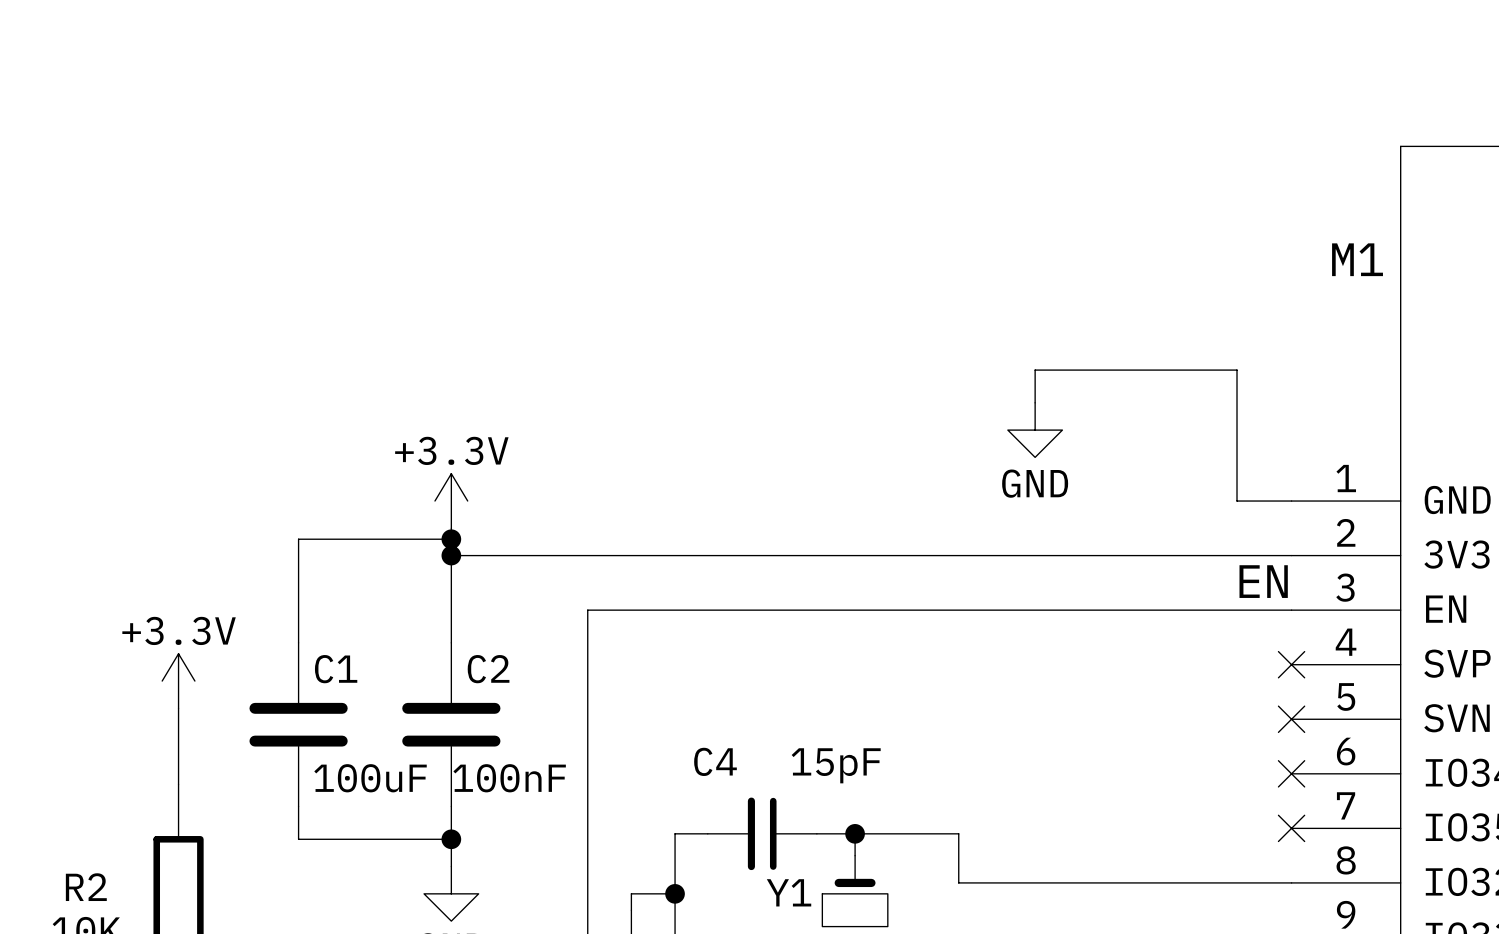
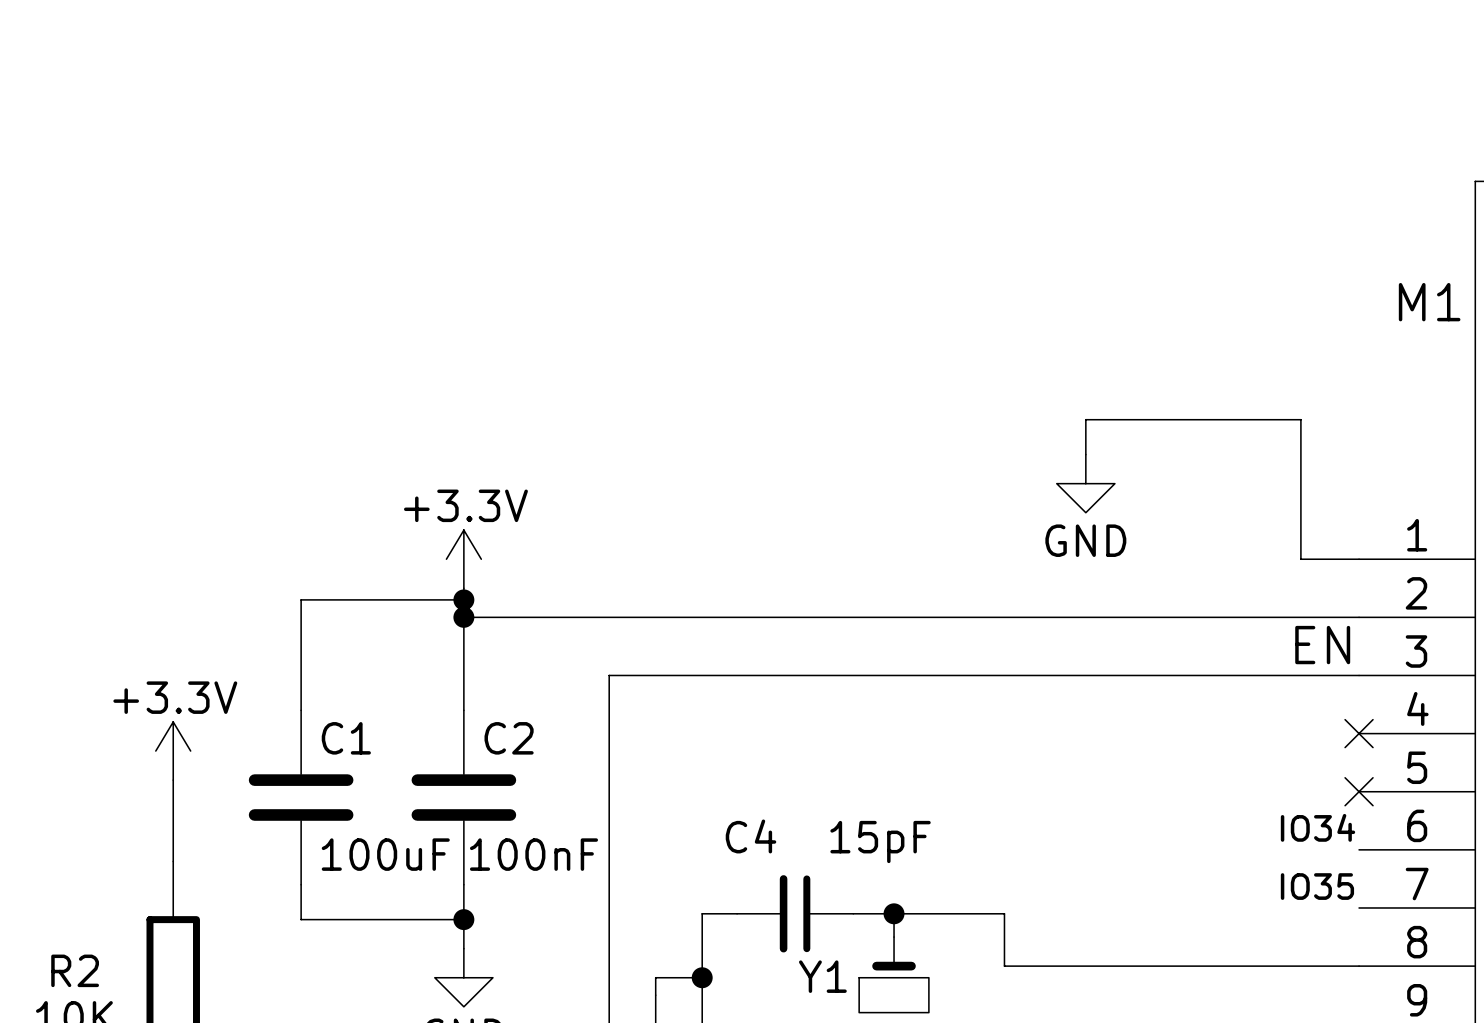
label: none -> IO34 (1318, 827)
no-connect mark: (1291, 773) -> none
label: none -> IO35 (1317, 886)
no-connect mark: (1291, 828) -> none

